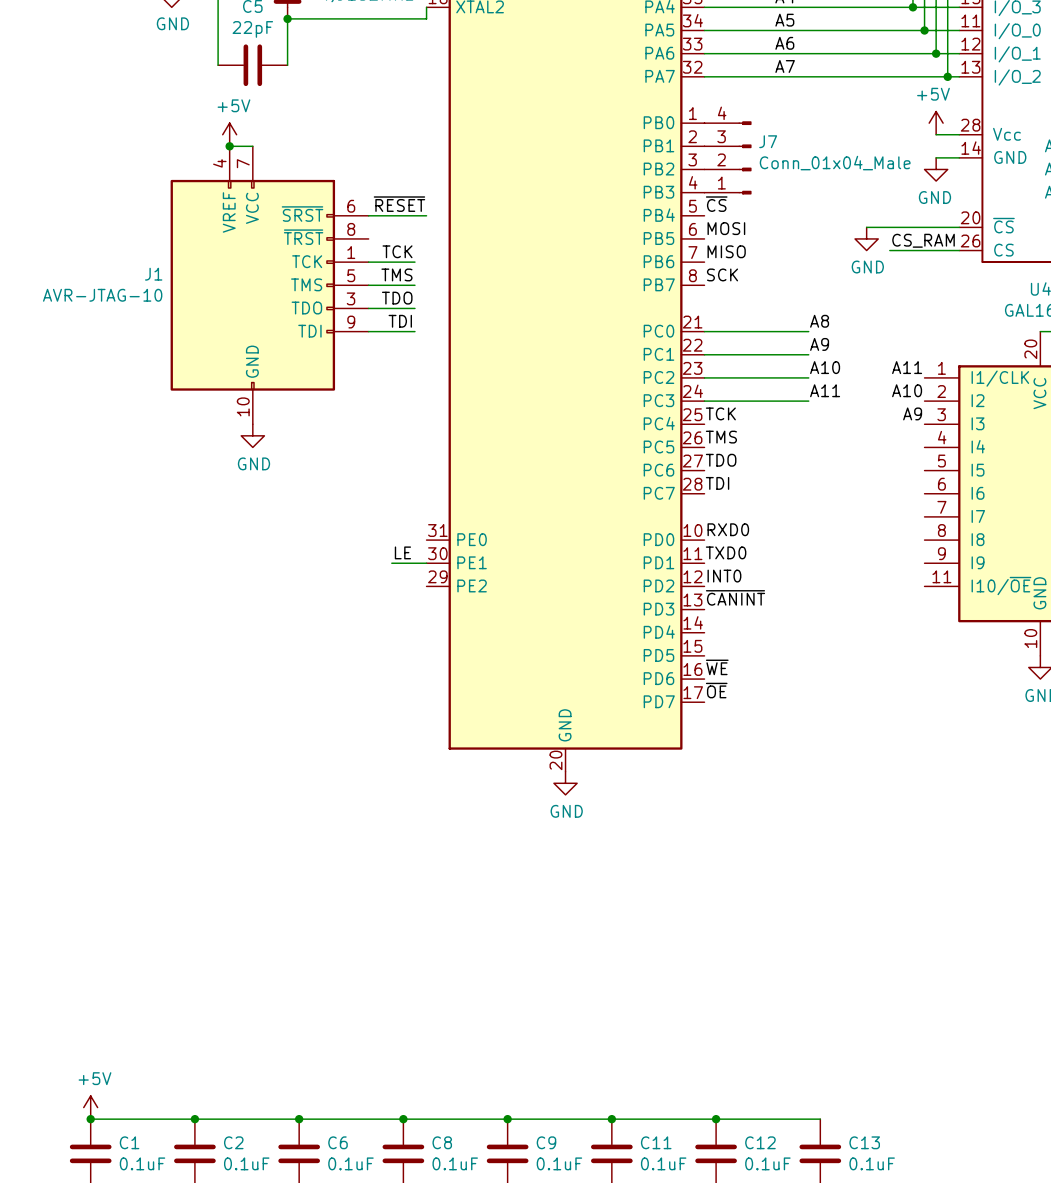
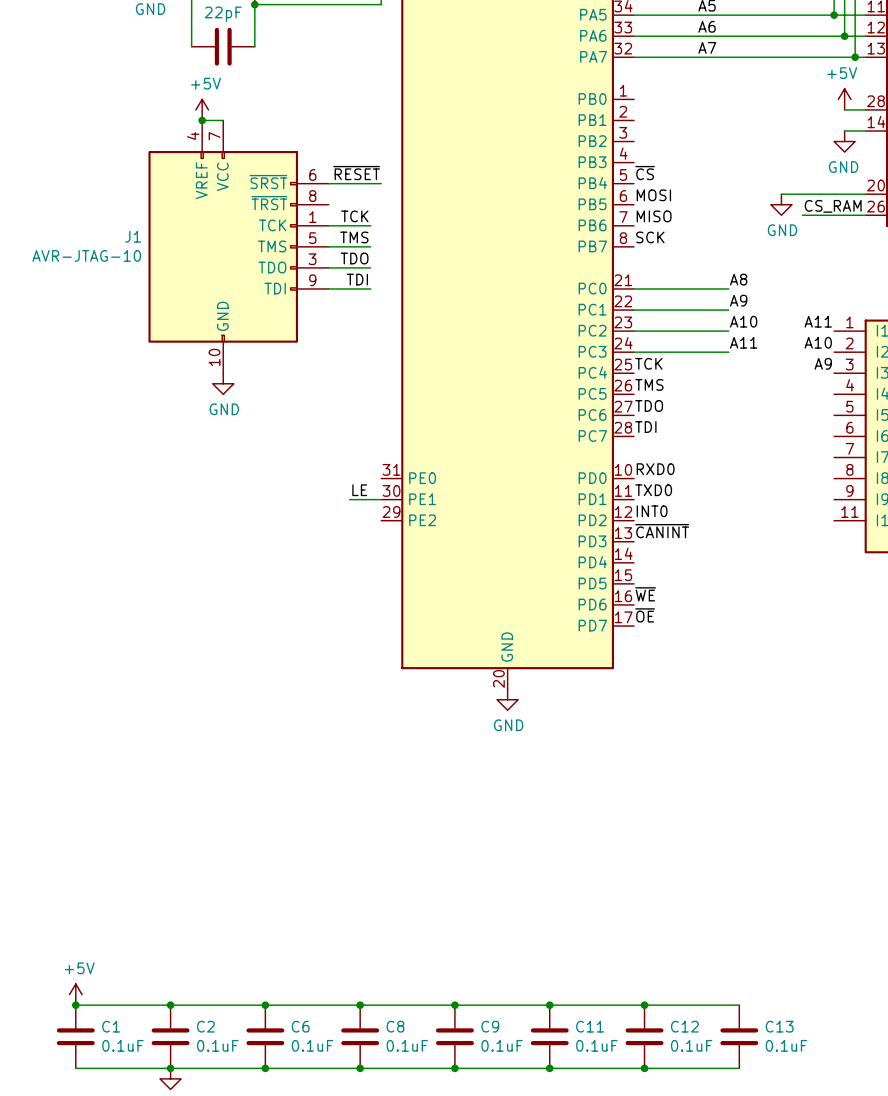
J7: Conn_01x04_Male (728, 157) -> none

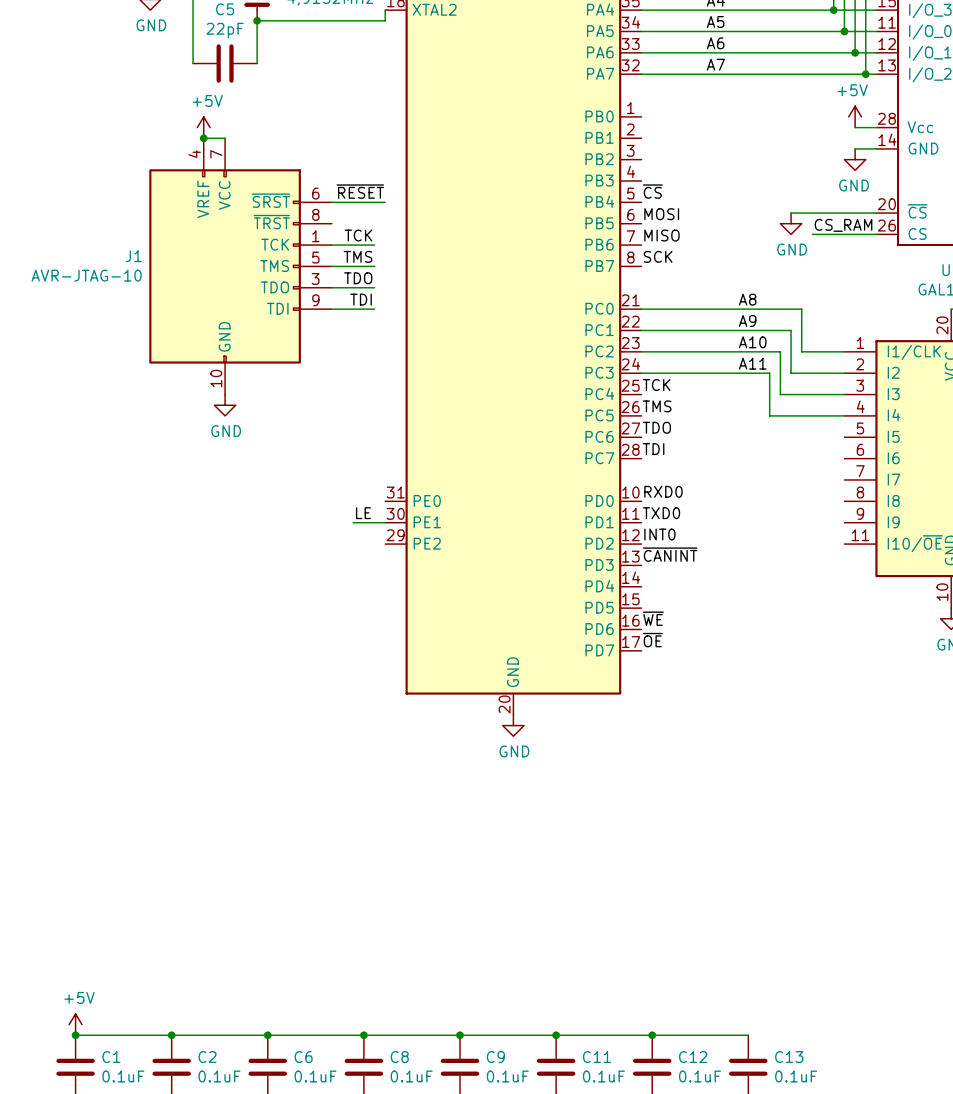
wire: none -> (737, 309) (801, 309) (801, 351) (844, 351)
wire: none -> (737, 330) (791, 330) (791, 373) (844, 373)
label: A11 (818, 321) -> none
wire: none -> (737, 351) (780, 351) (780, 394) (844, 394)
label: A10 (818, 342) -> none
wire: none -> (737, 373) (769, 373) (769, 415) (844, 415)
label: A9 (823, 363) -> none

